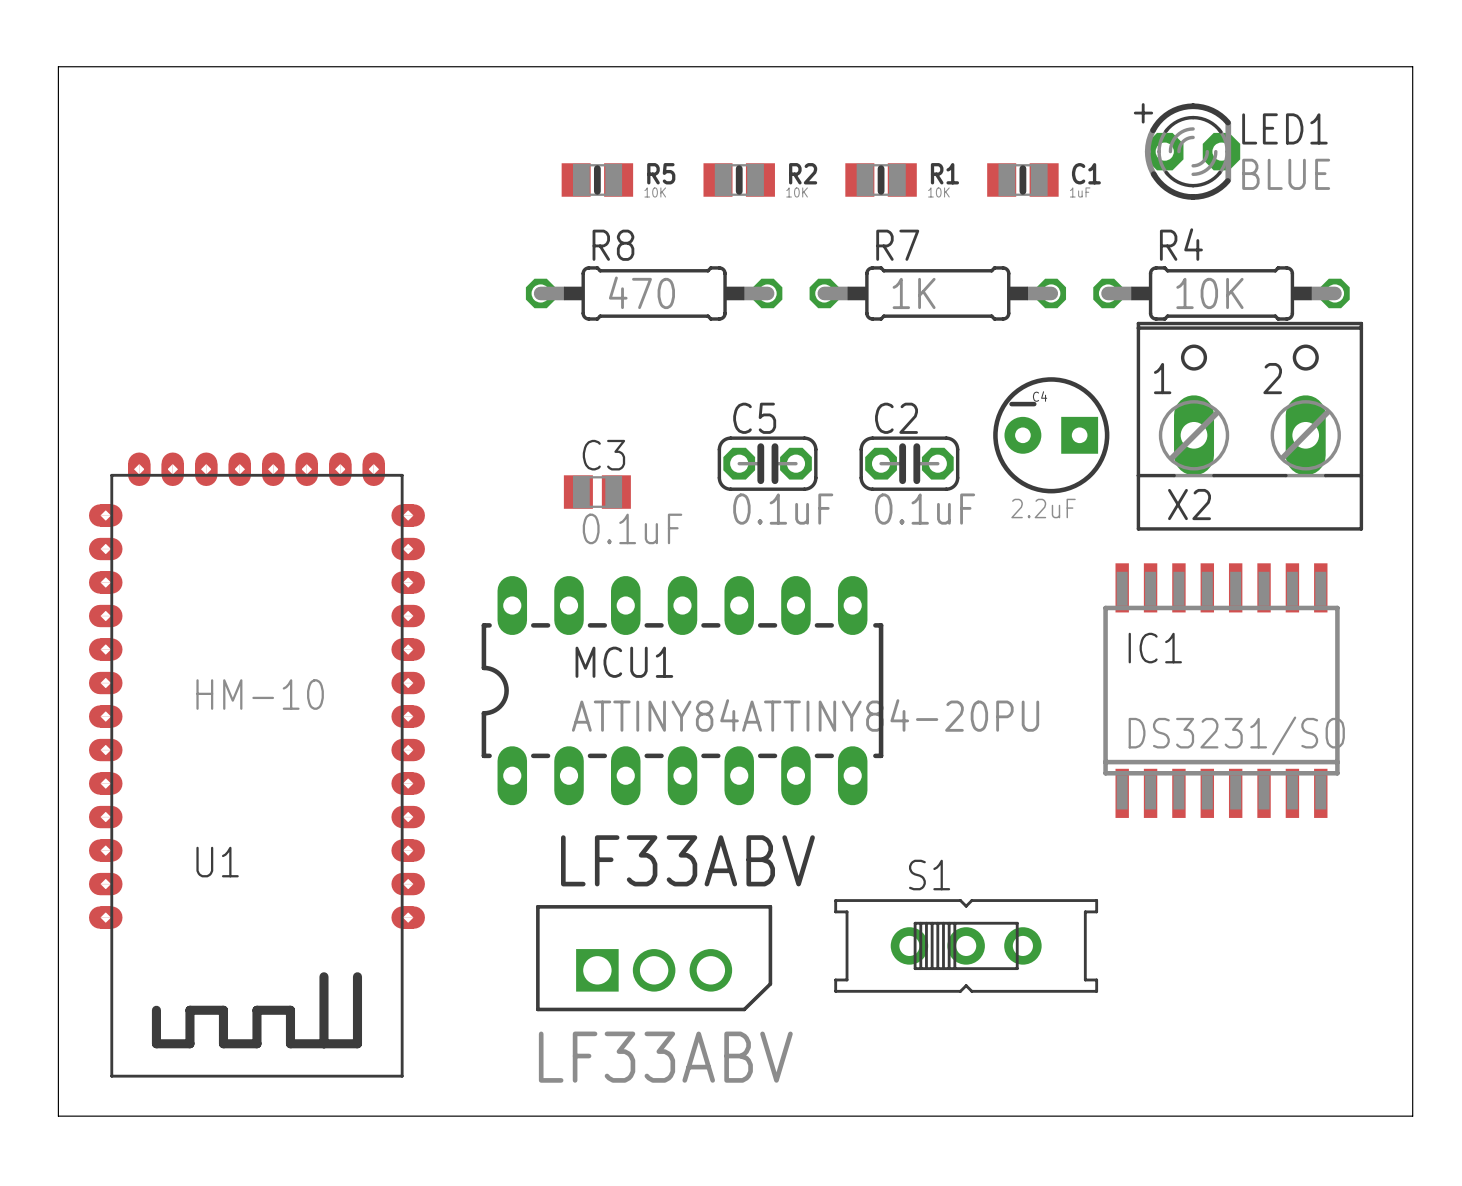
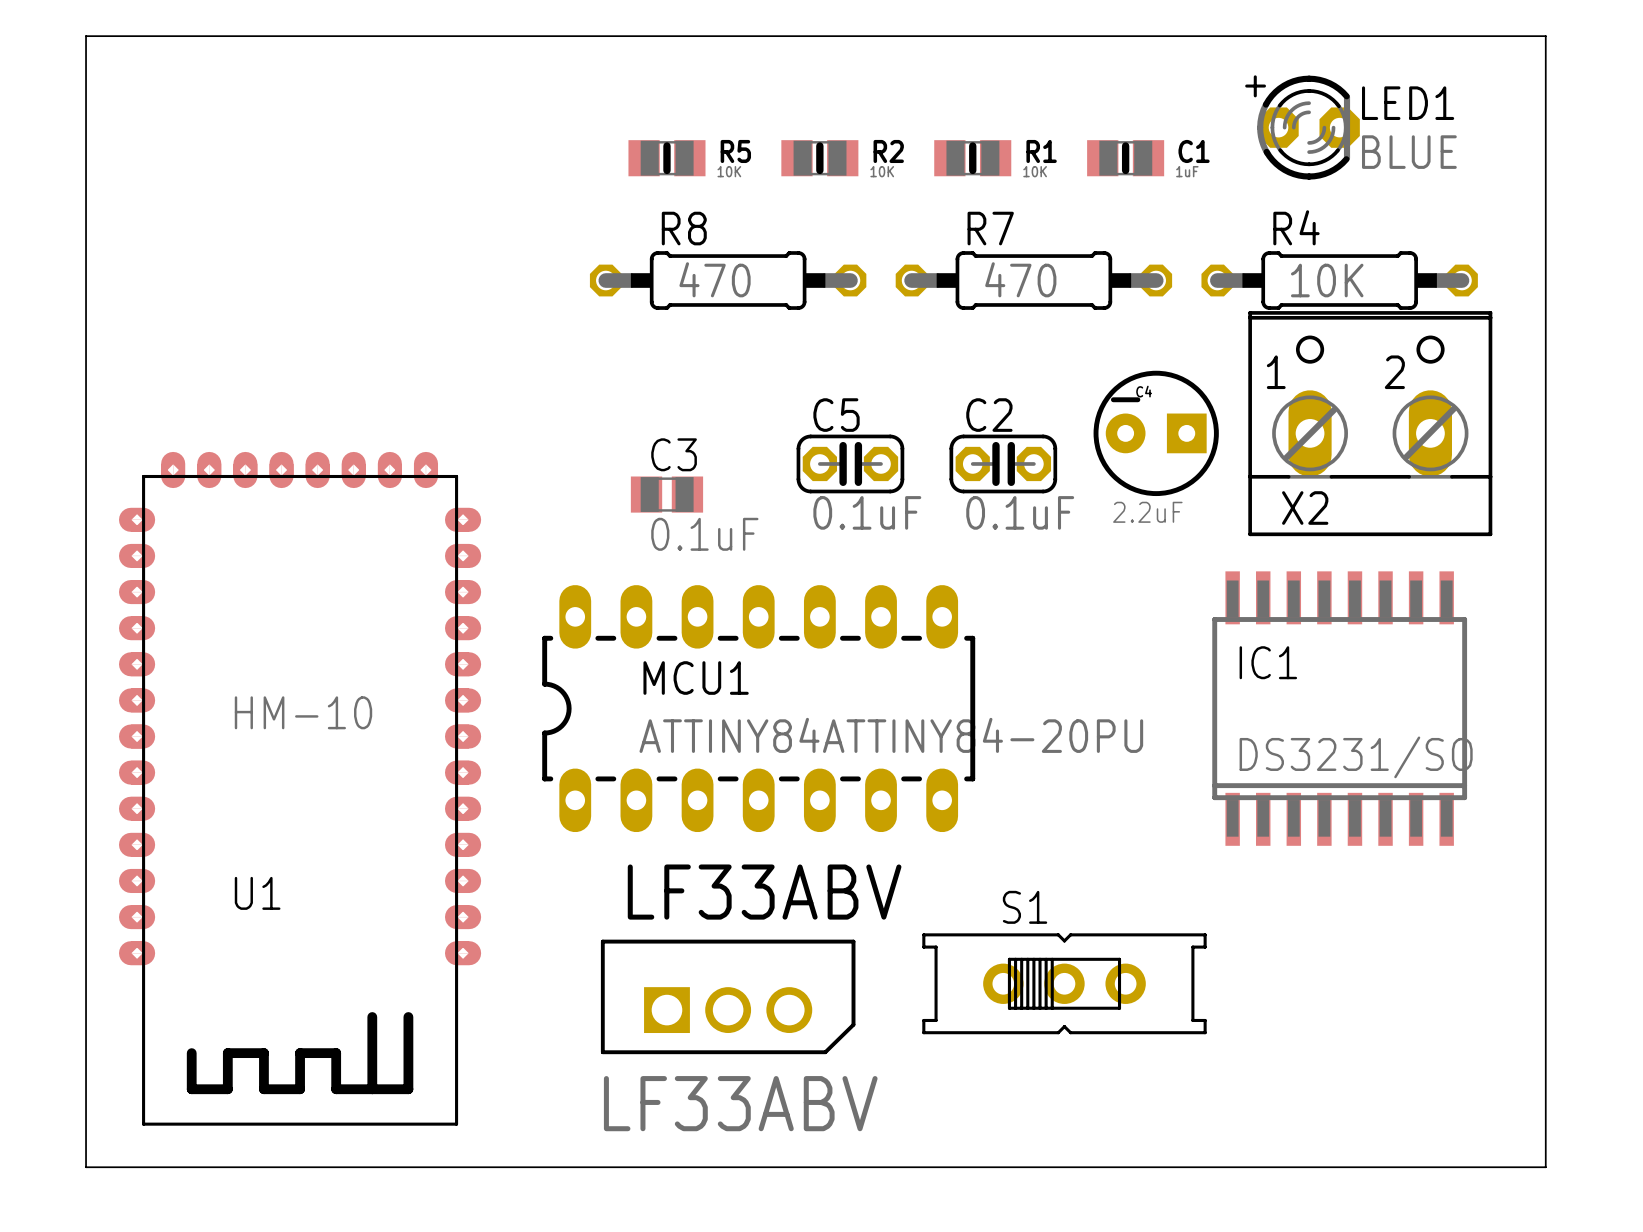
R7 value: 1K (914, 293) -> 470 (1020, 279)

